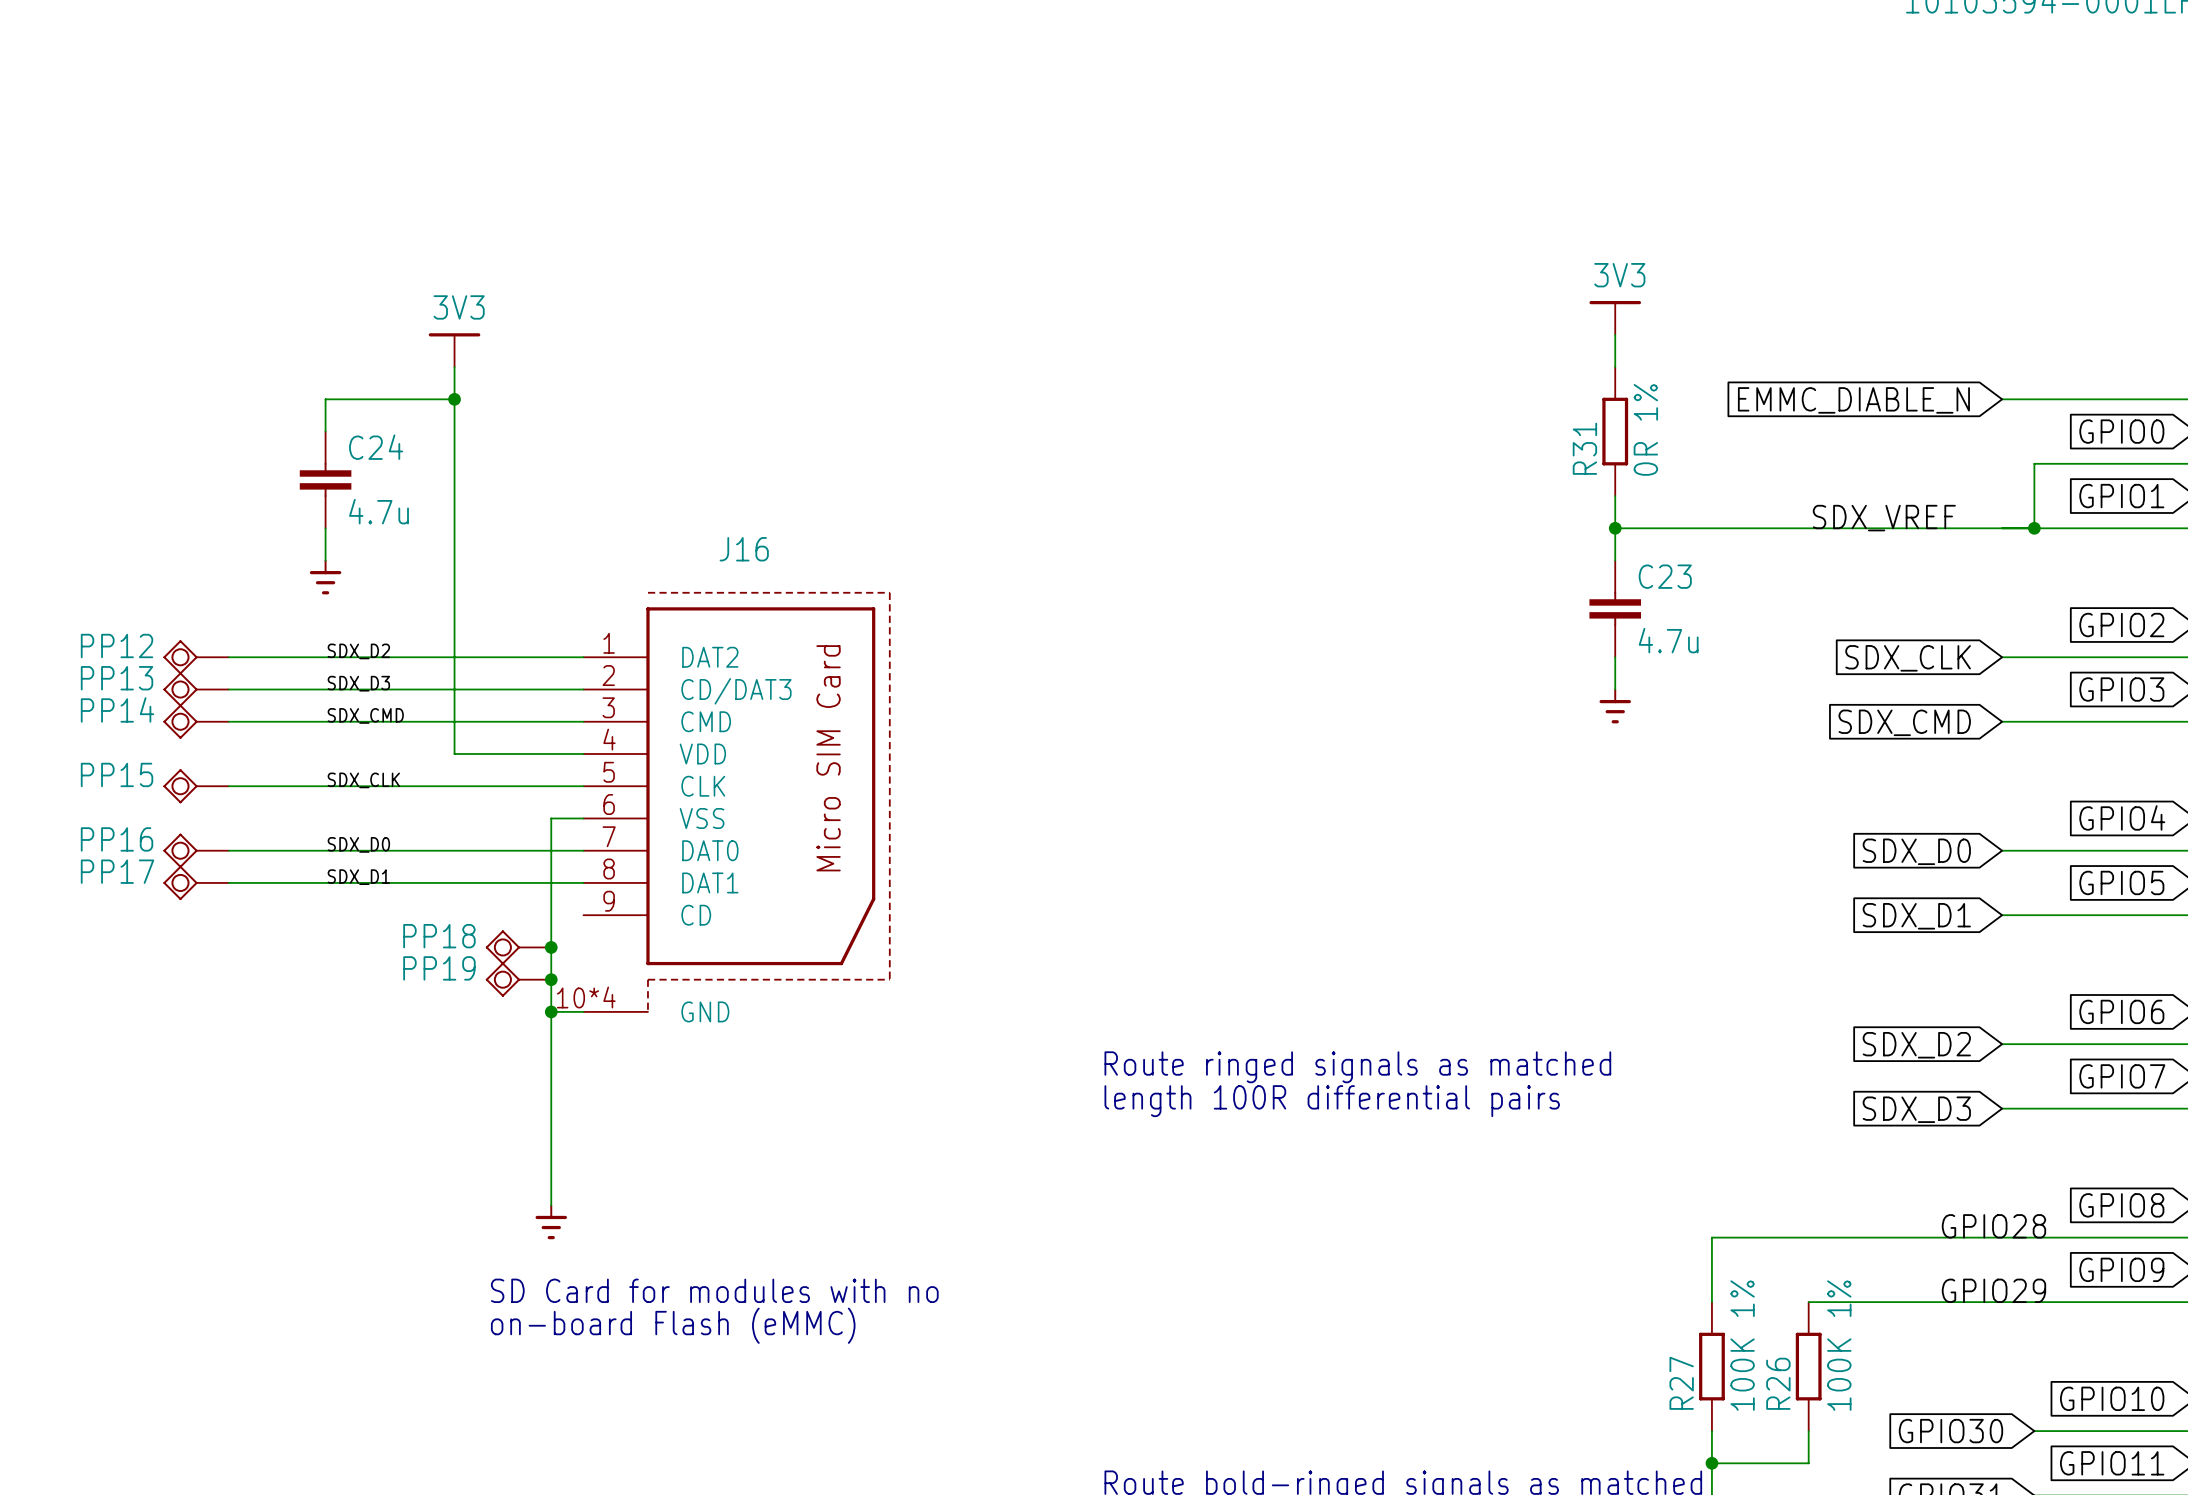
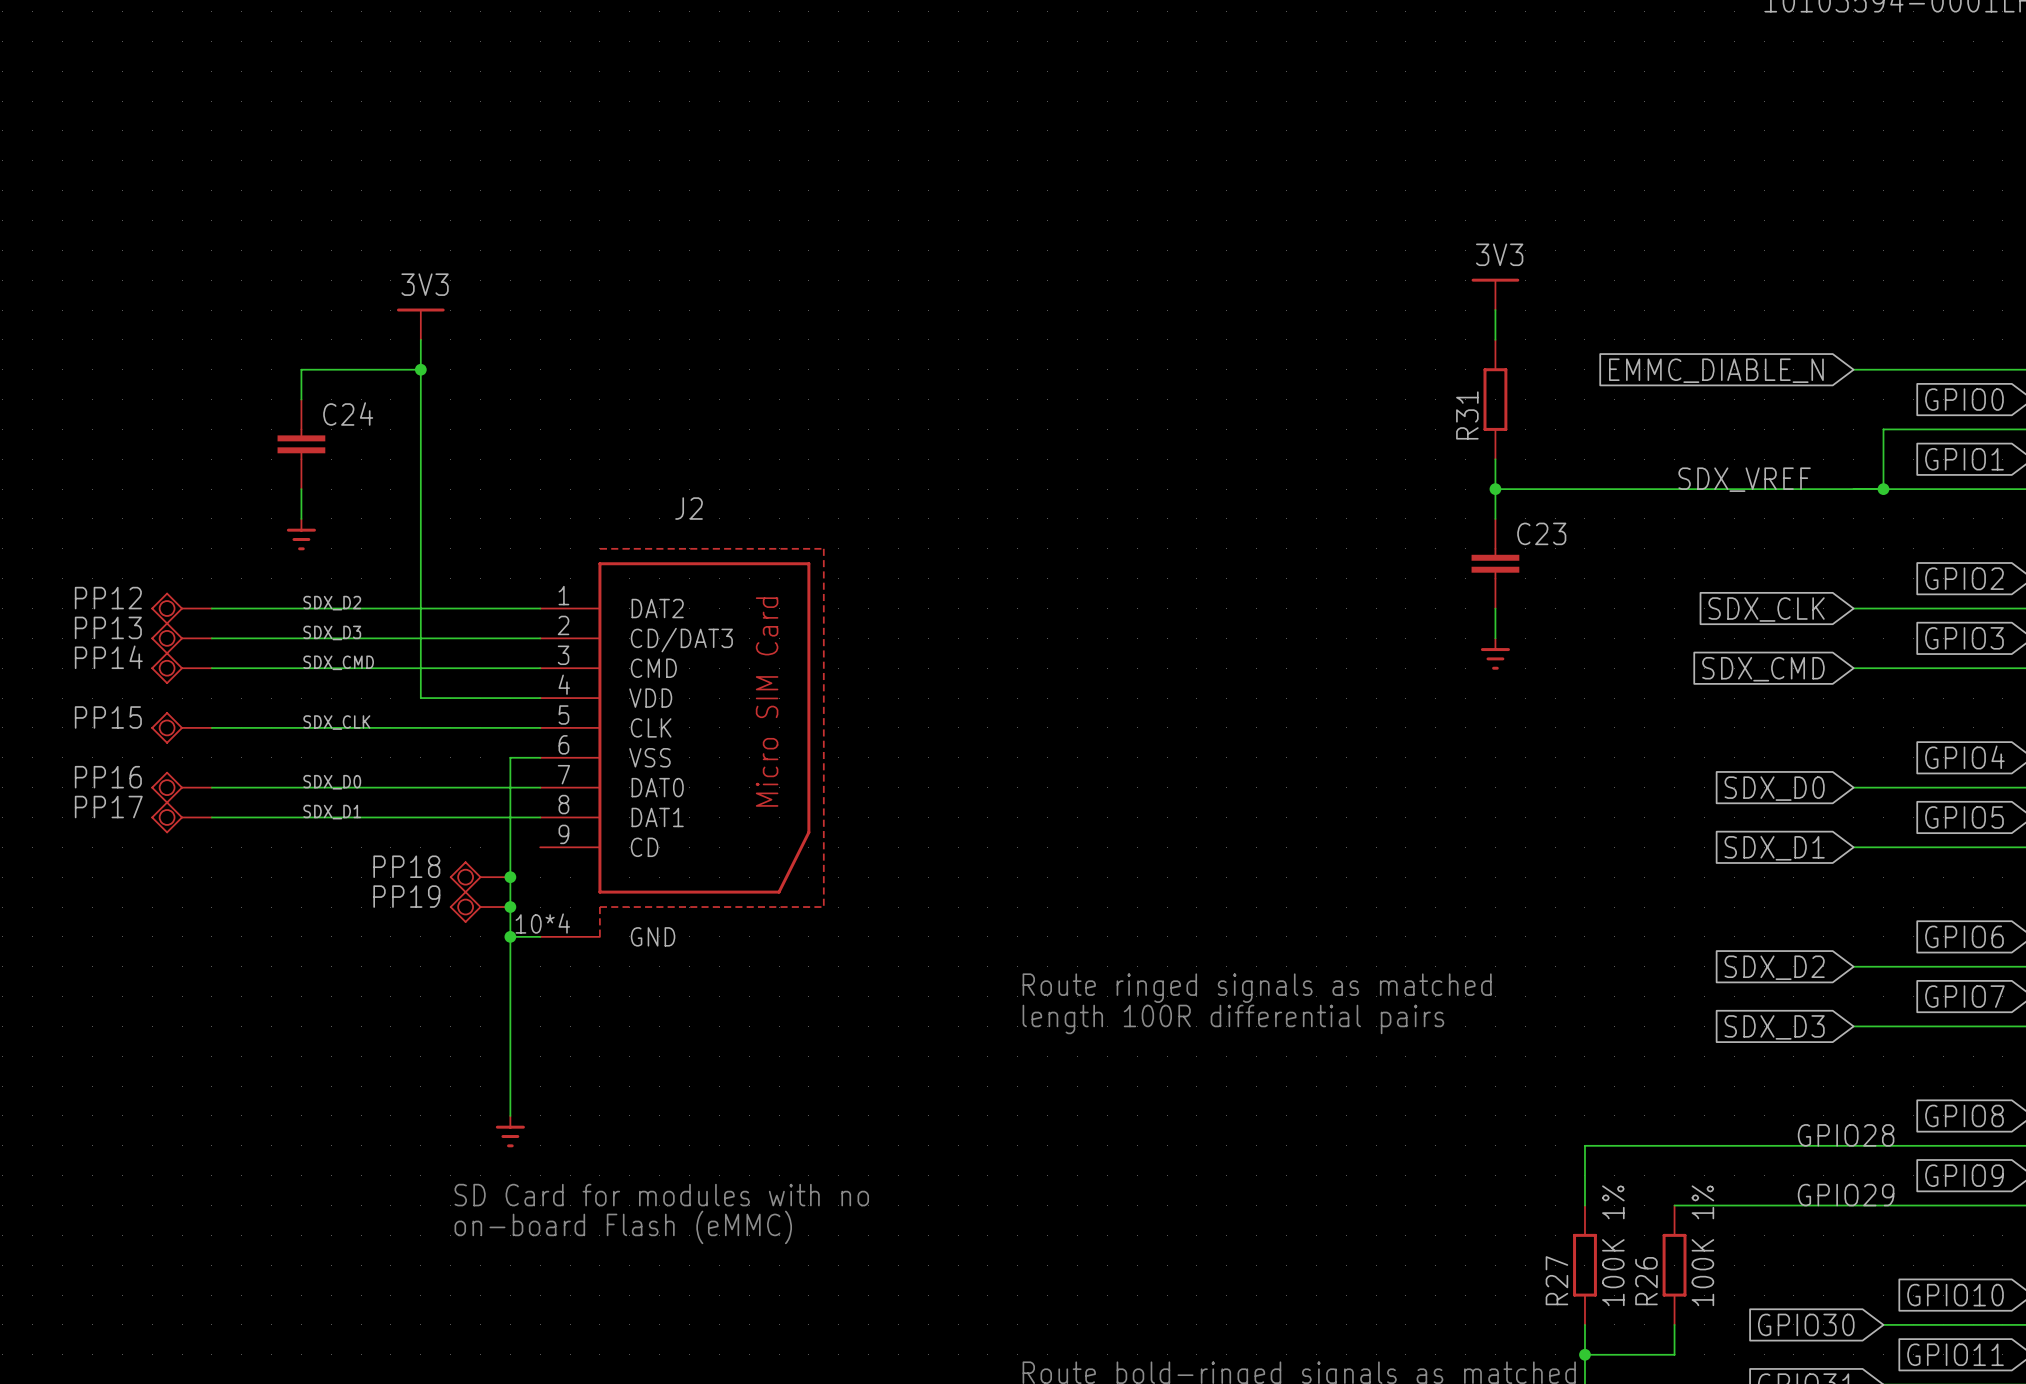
R31 value: 0R 1% (1645, 429) -> none
C24 value: 4.7u (378, 511) -> none
J16 name: J16 (744, 549) -> J2 (689, 508)
C23 value: 4.7u (1668, 640) -> none

